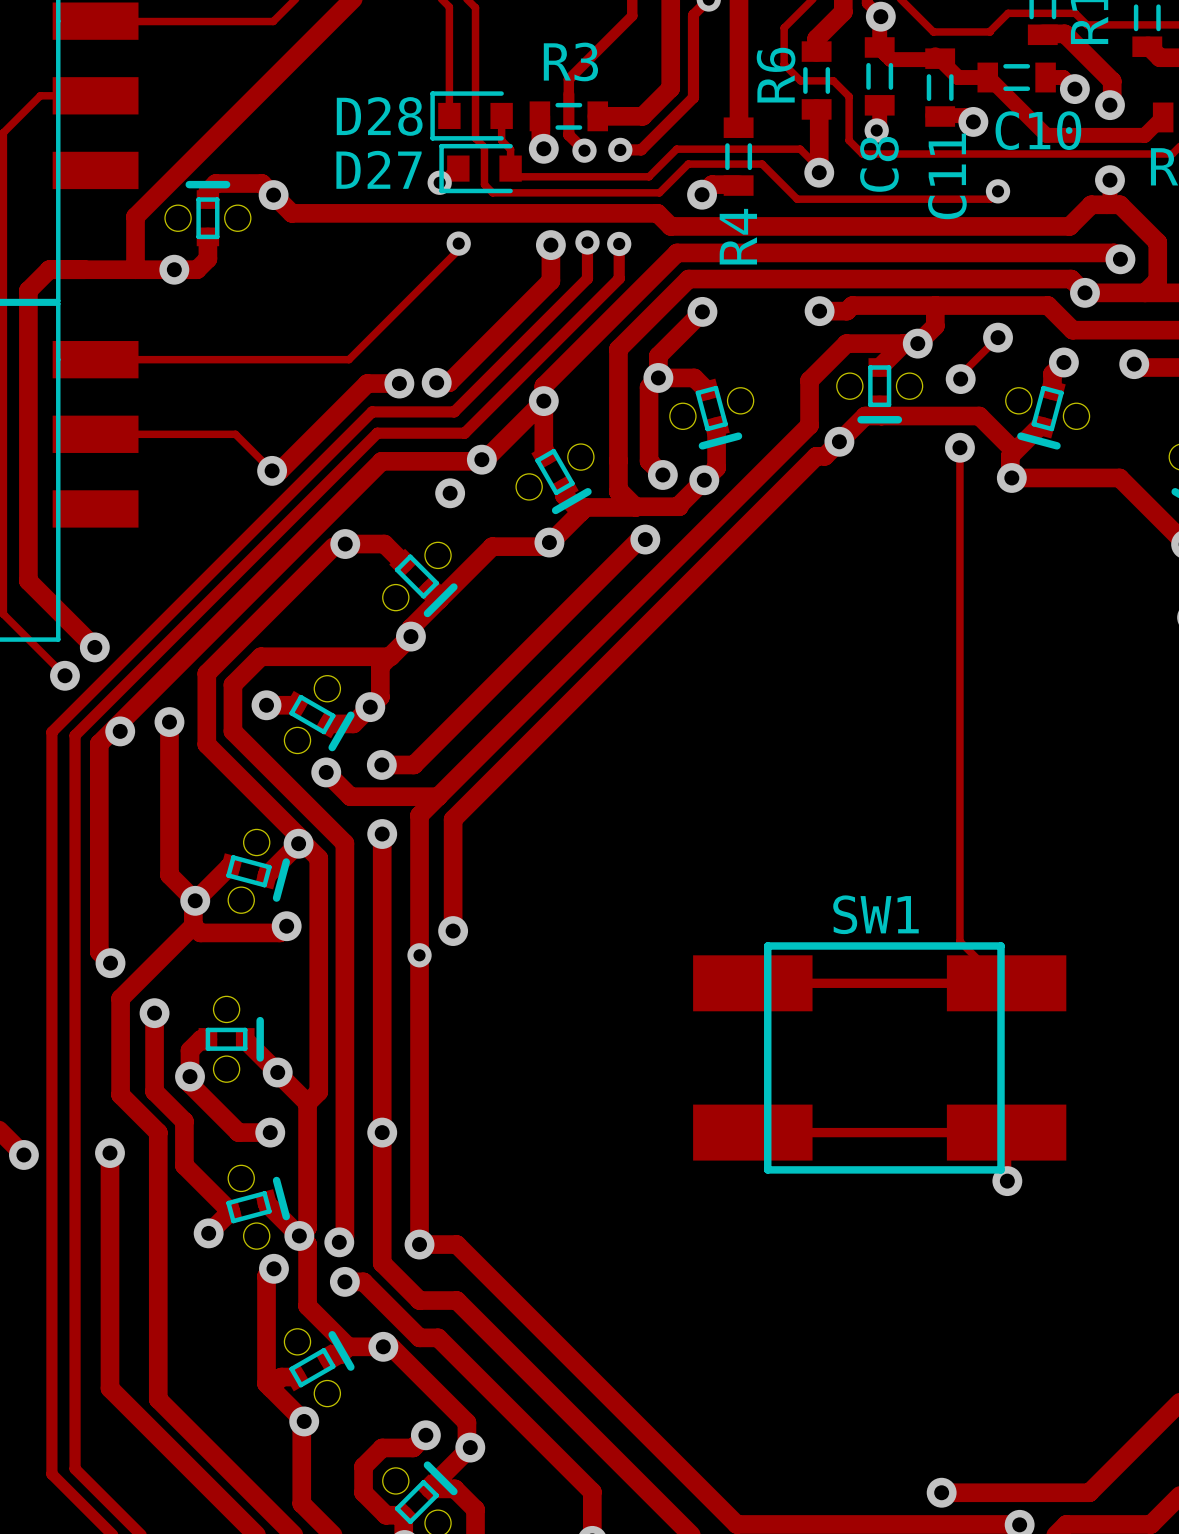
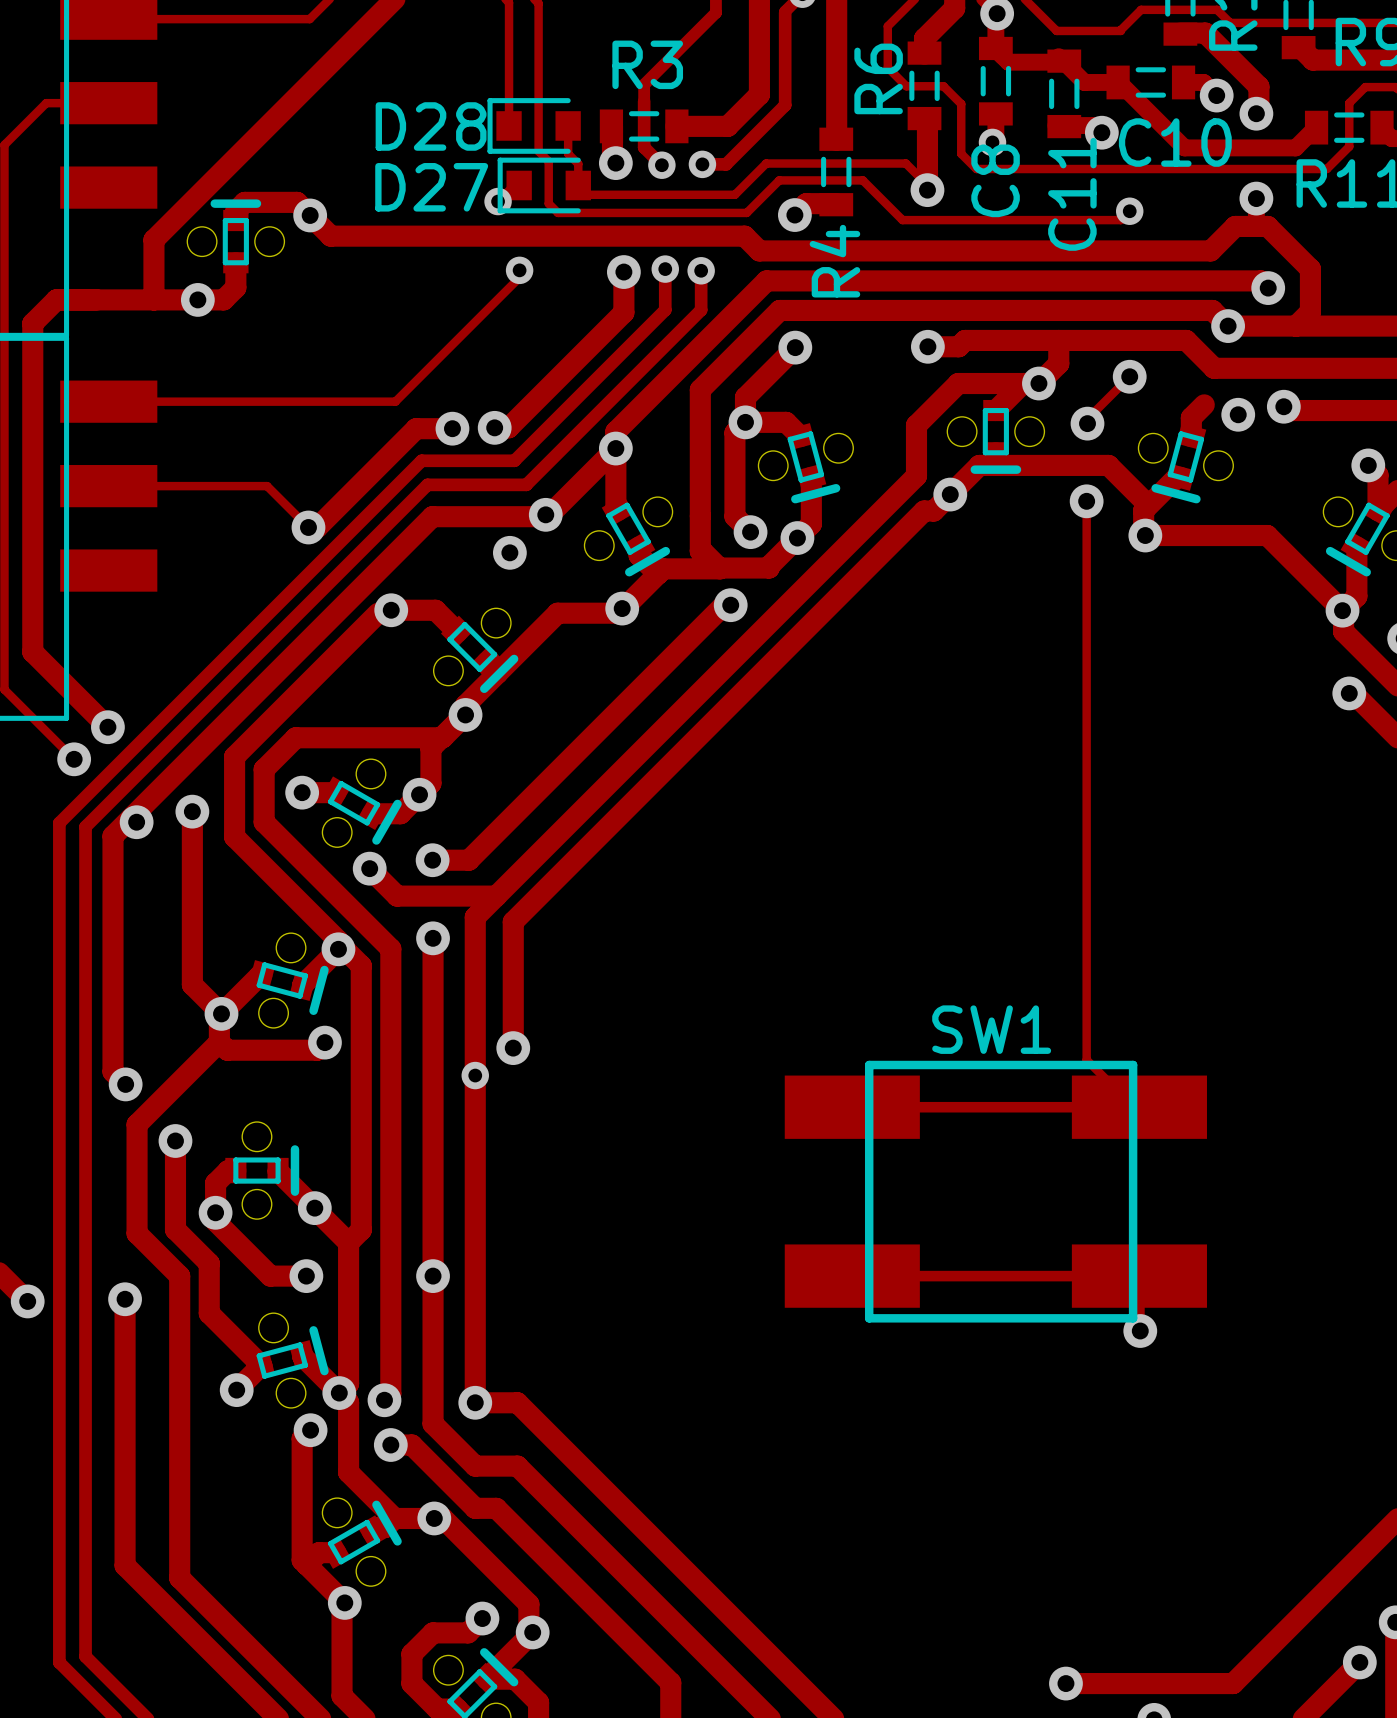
via position: (1063, 362) -> (1238, 414)

